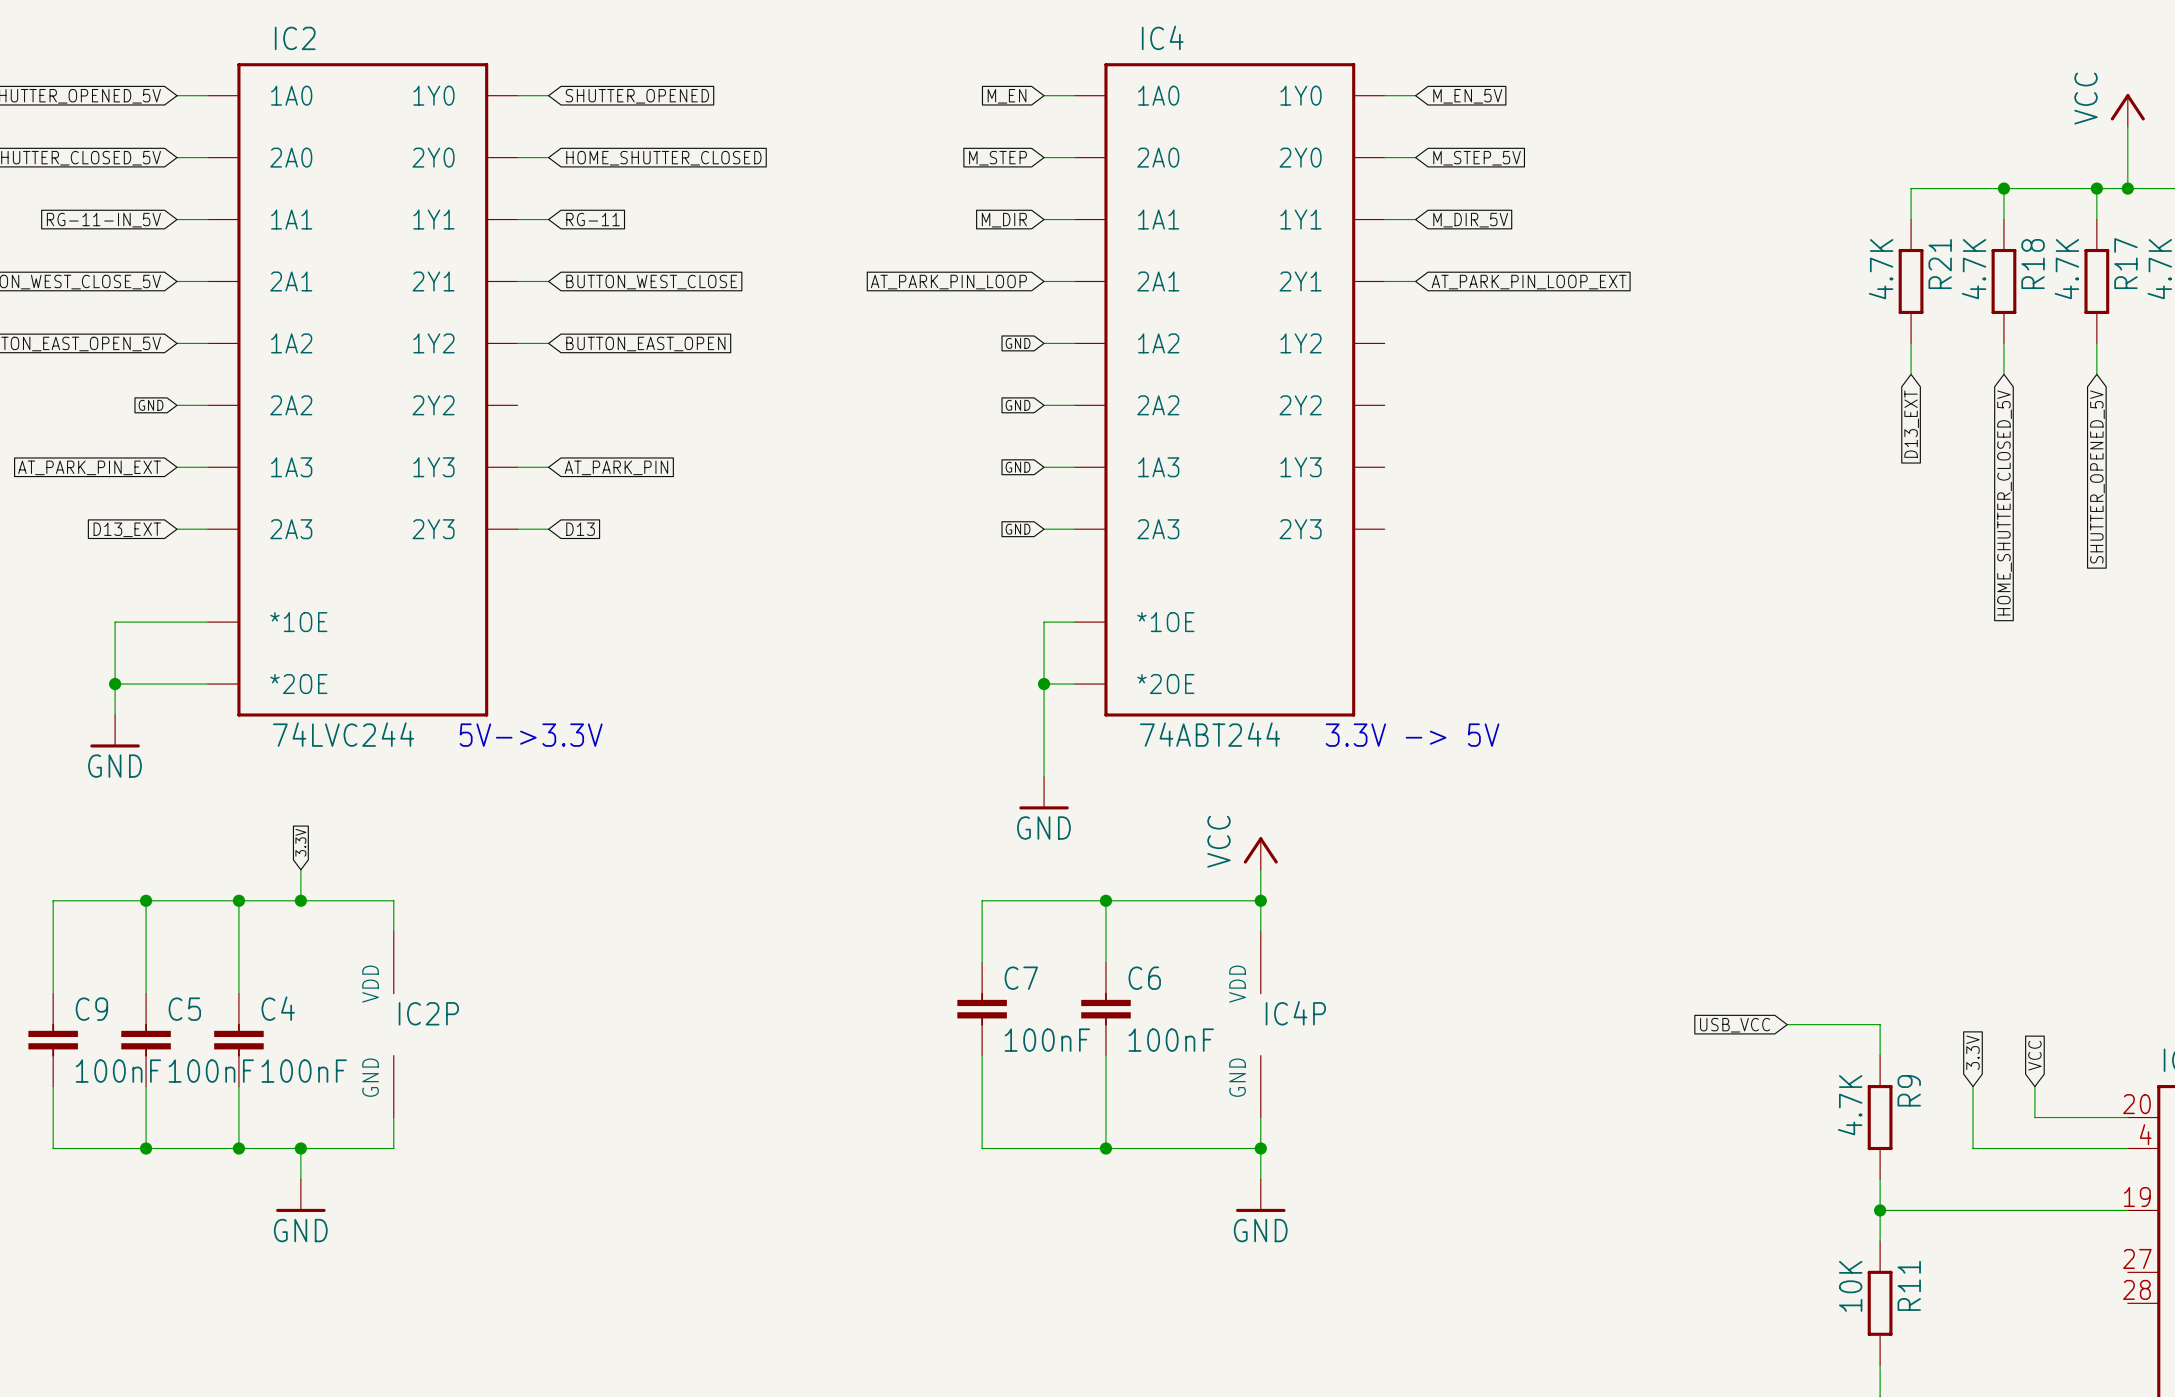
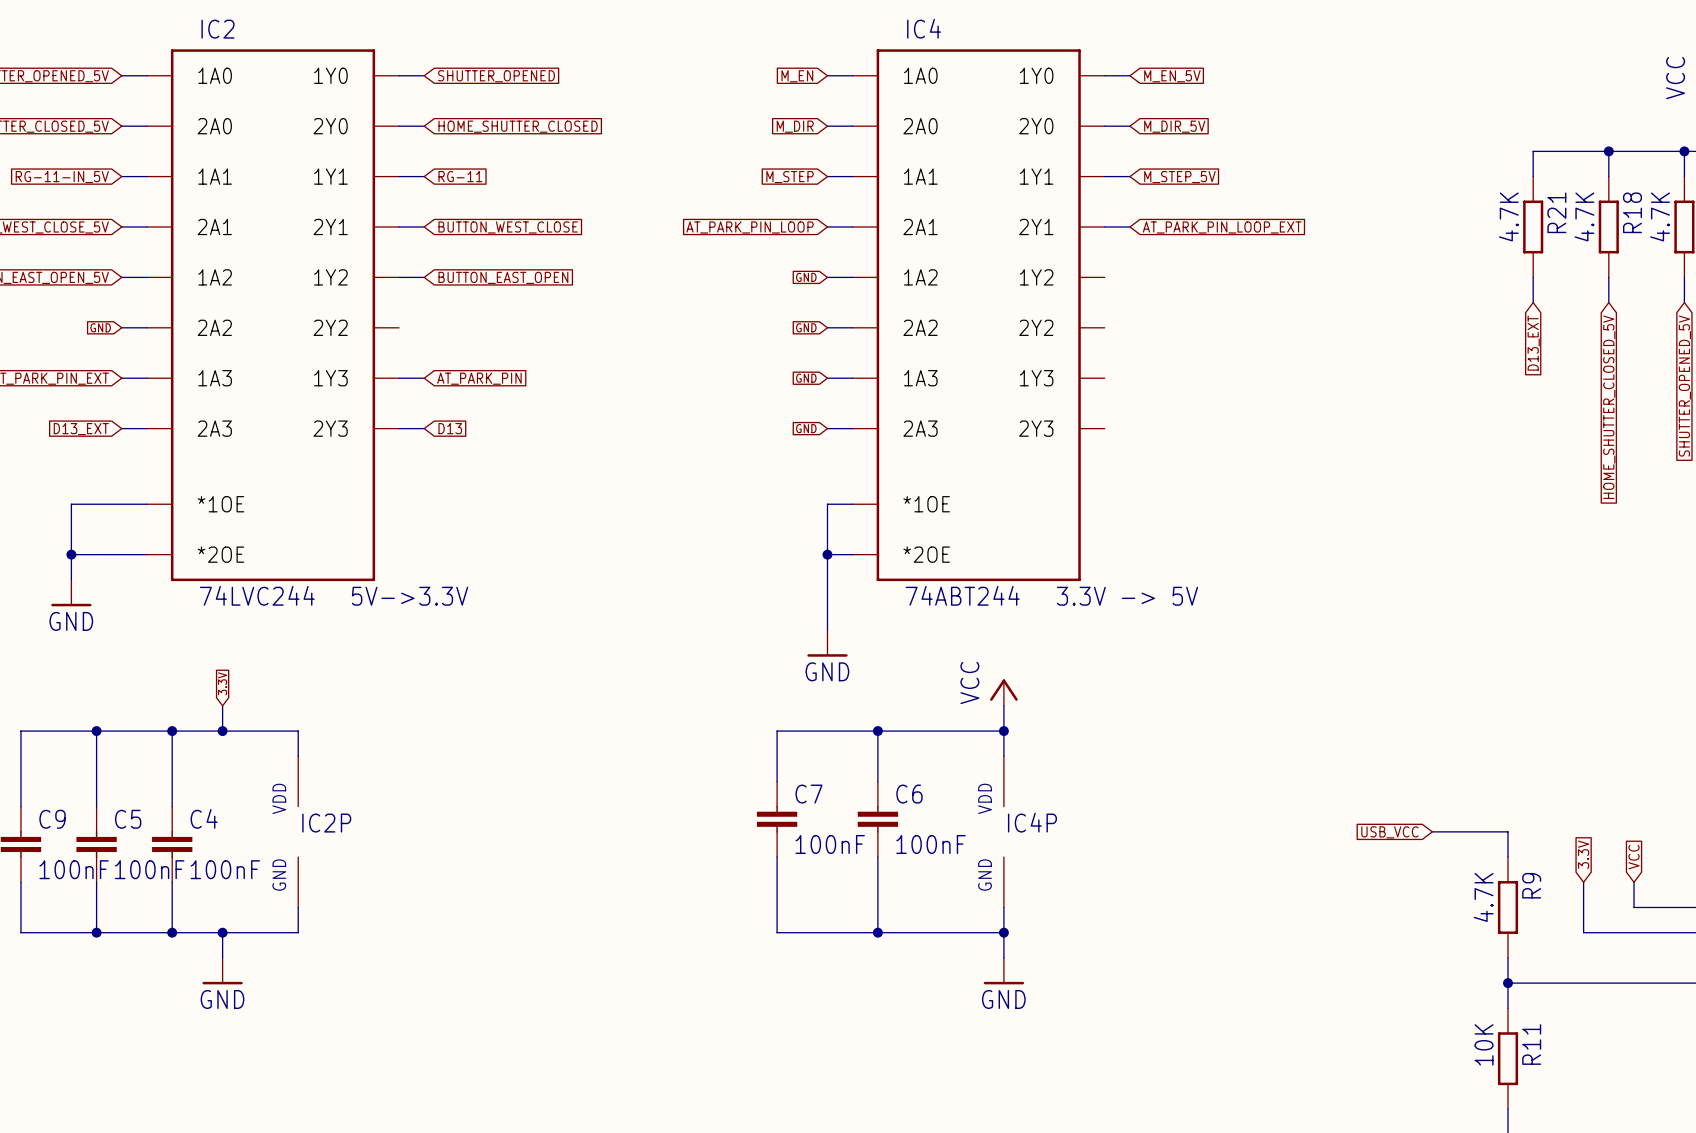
global label: M_STEP (998, 158) -> M_DIR (795, 126)
global label: M_STEP_5V (1477, 158) -> M_DIR_5V (1174, 126)
global label: M_DIR (1004, 220) -> M_STEP (790, 177)
global label: M_DIR_5V (1470, 220) -> M_STEP_5V (1179, 177)

